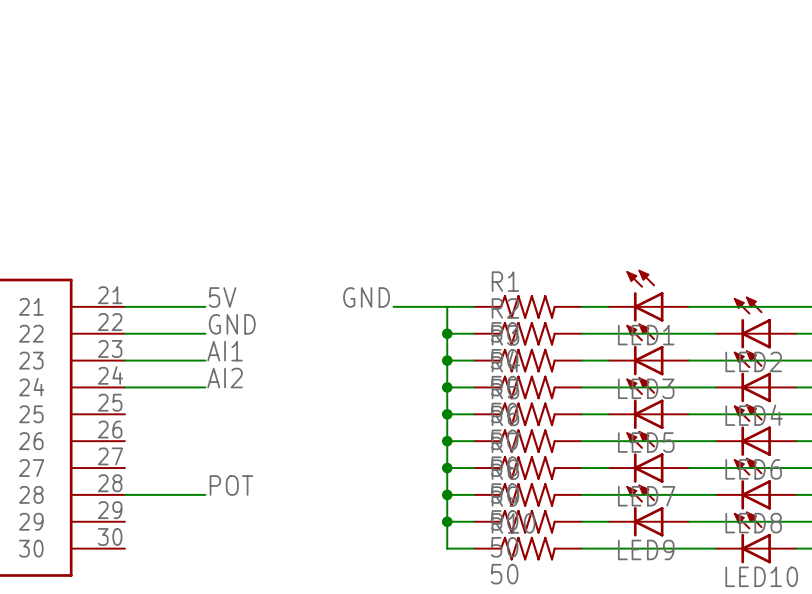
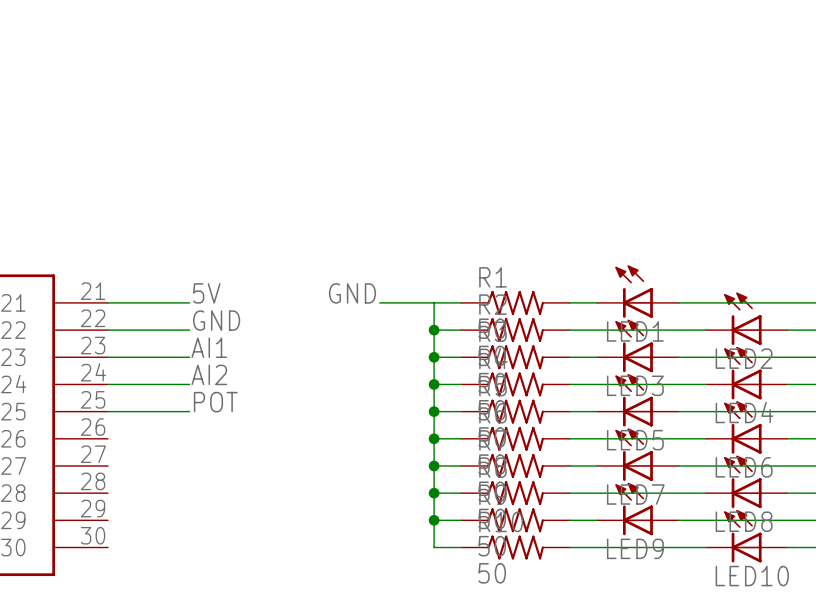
label position: POT (231, 485) -> POT (215, 402)
wire: (124, 494) (205, 494) -> (107, 411) (189, 411)

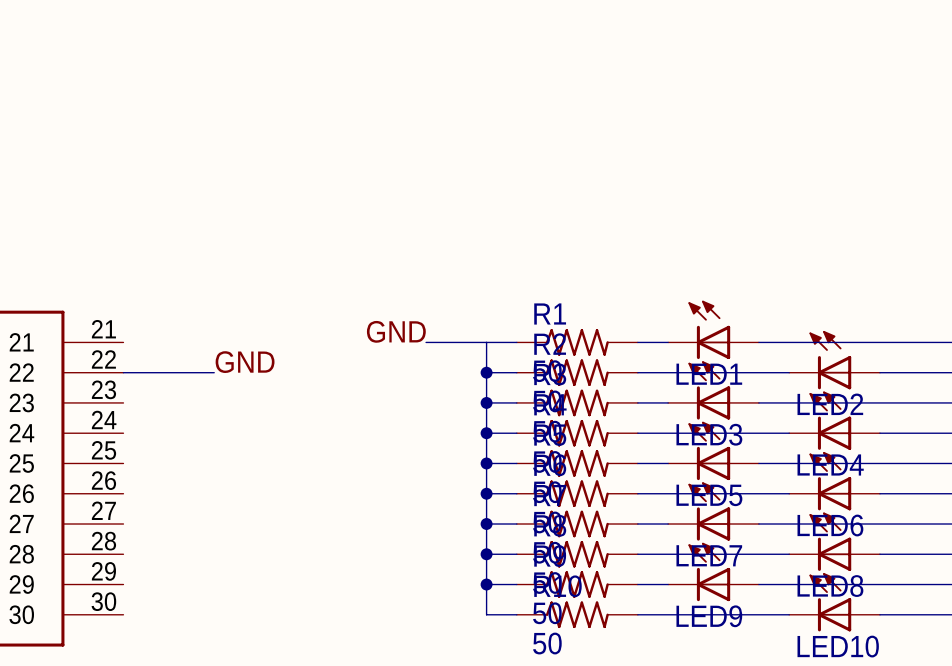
label: 5V (206, 293) -> none
wire: (107, 302) (189, 302) -> none
label: AI1 (209, 347) -> none
wire: (107, 357) (189, 357) -> none
label: AI2 (209, 374) -> none
wire: (107, 384) (189, 384) -> none
label: POT (215, 402) -> none
wire: (107, 411) (189, 411) -> none

